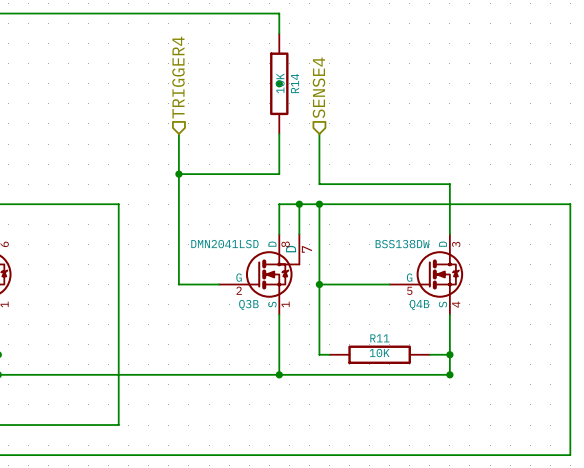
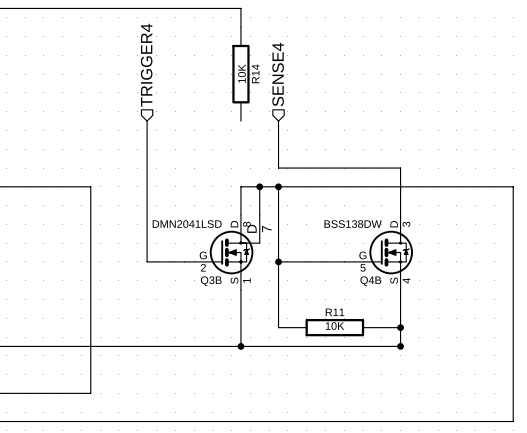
junction: (279, 83) -> none
wire: (279, 133) (279, 174) (178, 174) -> none
junction: (178, 174) -> none

